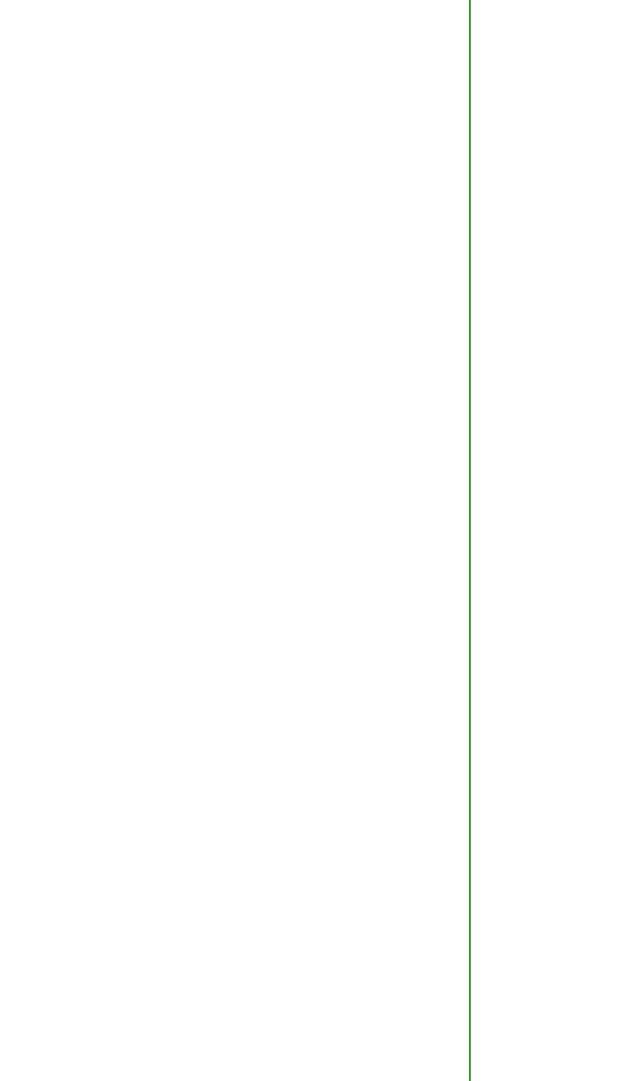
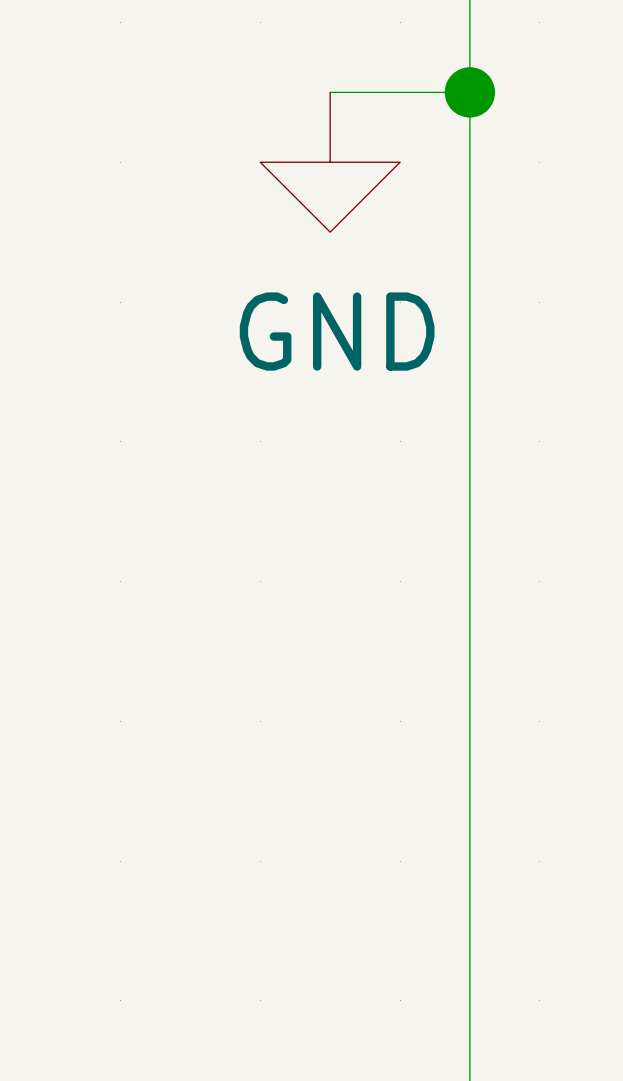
wire: none -> (330, 92) (469, 92)
junction: none -> (469, 92)
power symbol: none -> GND (330, 162)

